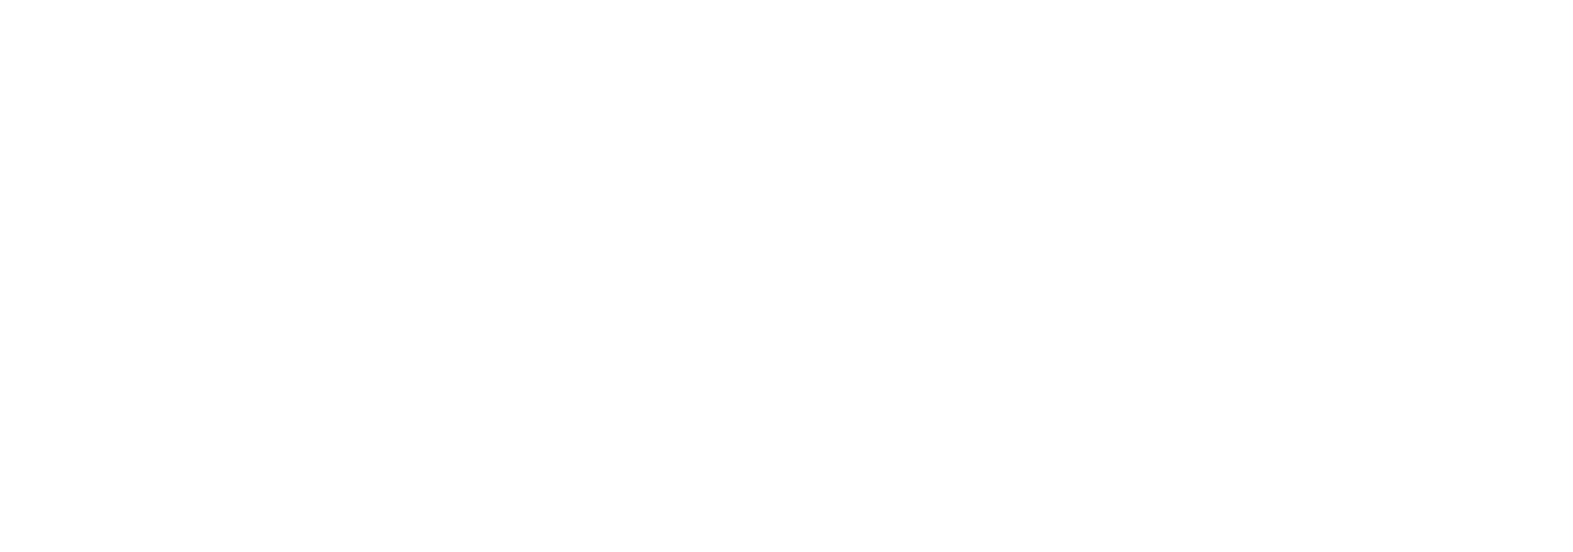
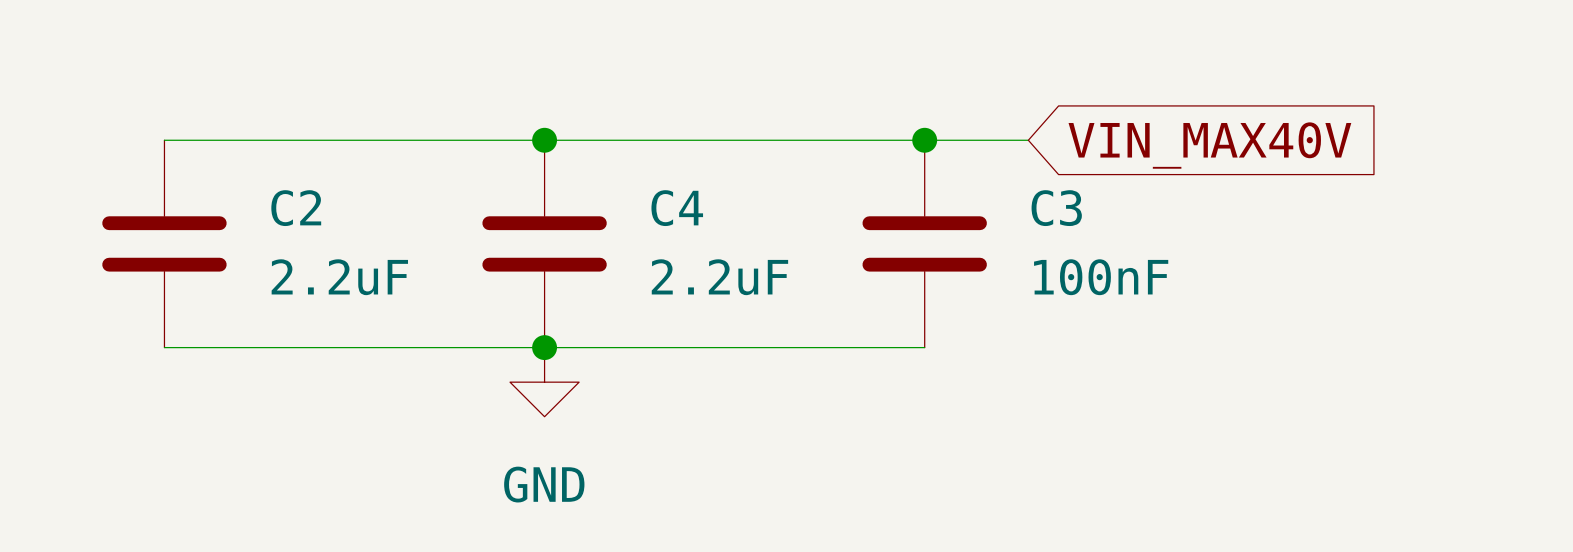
wire: none -> (164, 140) (1028, 140)
junction: none -> (544, 140)
junction: none -> (924, 140)
global label: none -> VIN_MAX40V (1209, 145)
C2: none -> 2.2uF (164, 243)
C4: none -> 2.2uF (544, 243)
C3: none -> 100nF (924, 243)
wire: none -> (164, 347) (924, 347)
junction: none -> (544, 347)
power symbol: none -> GND (544, 382)

